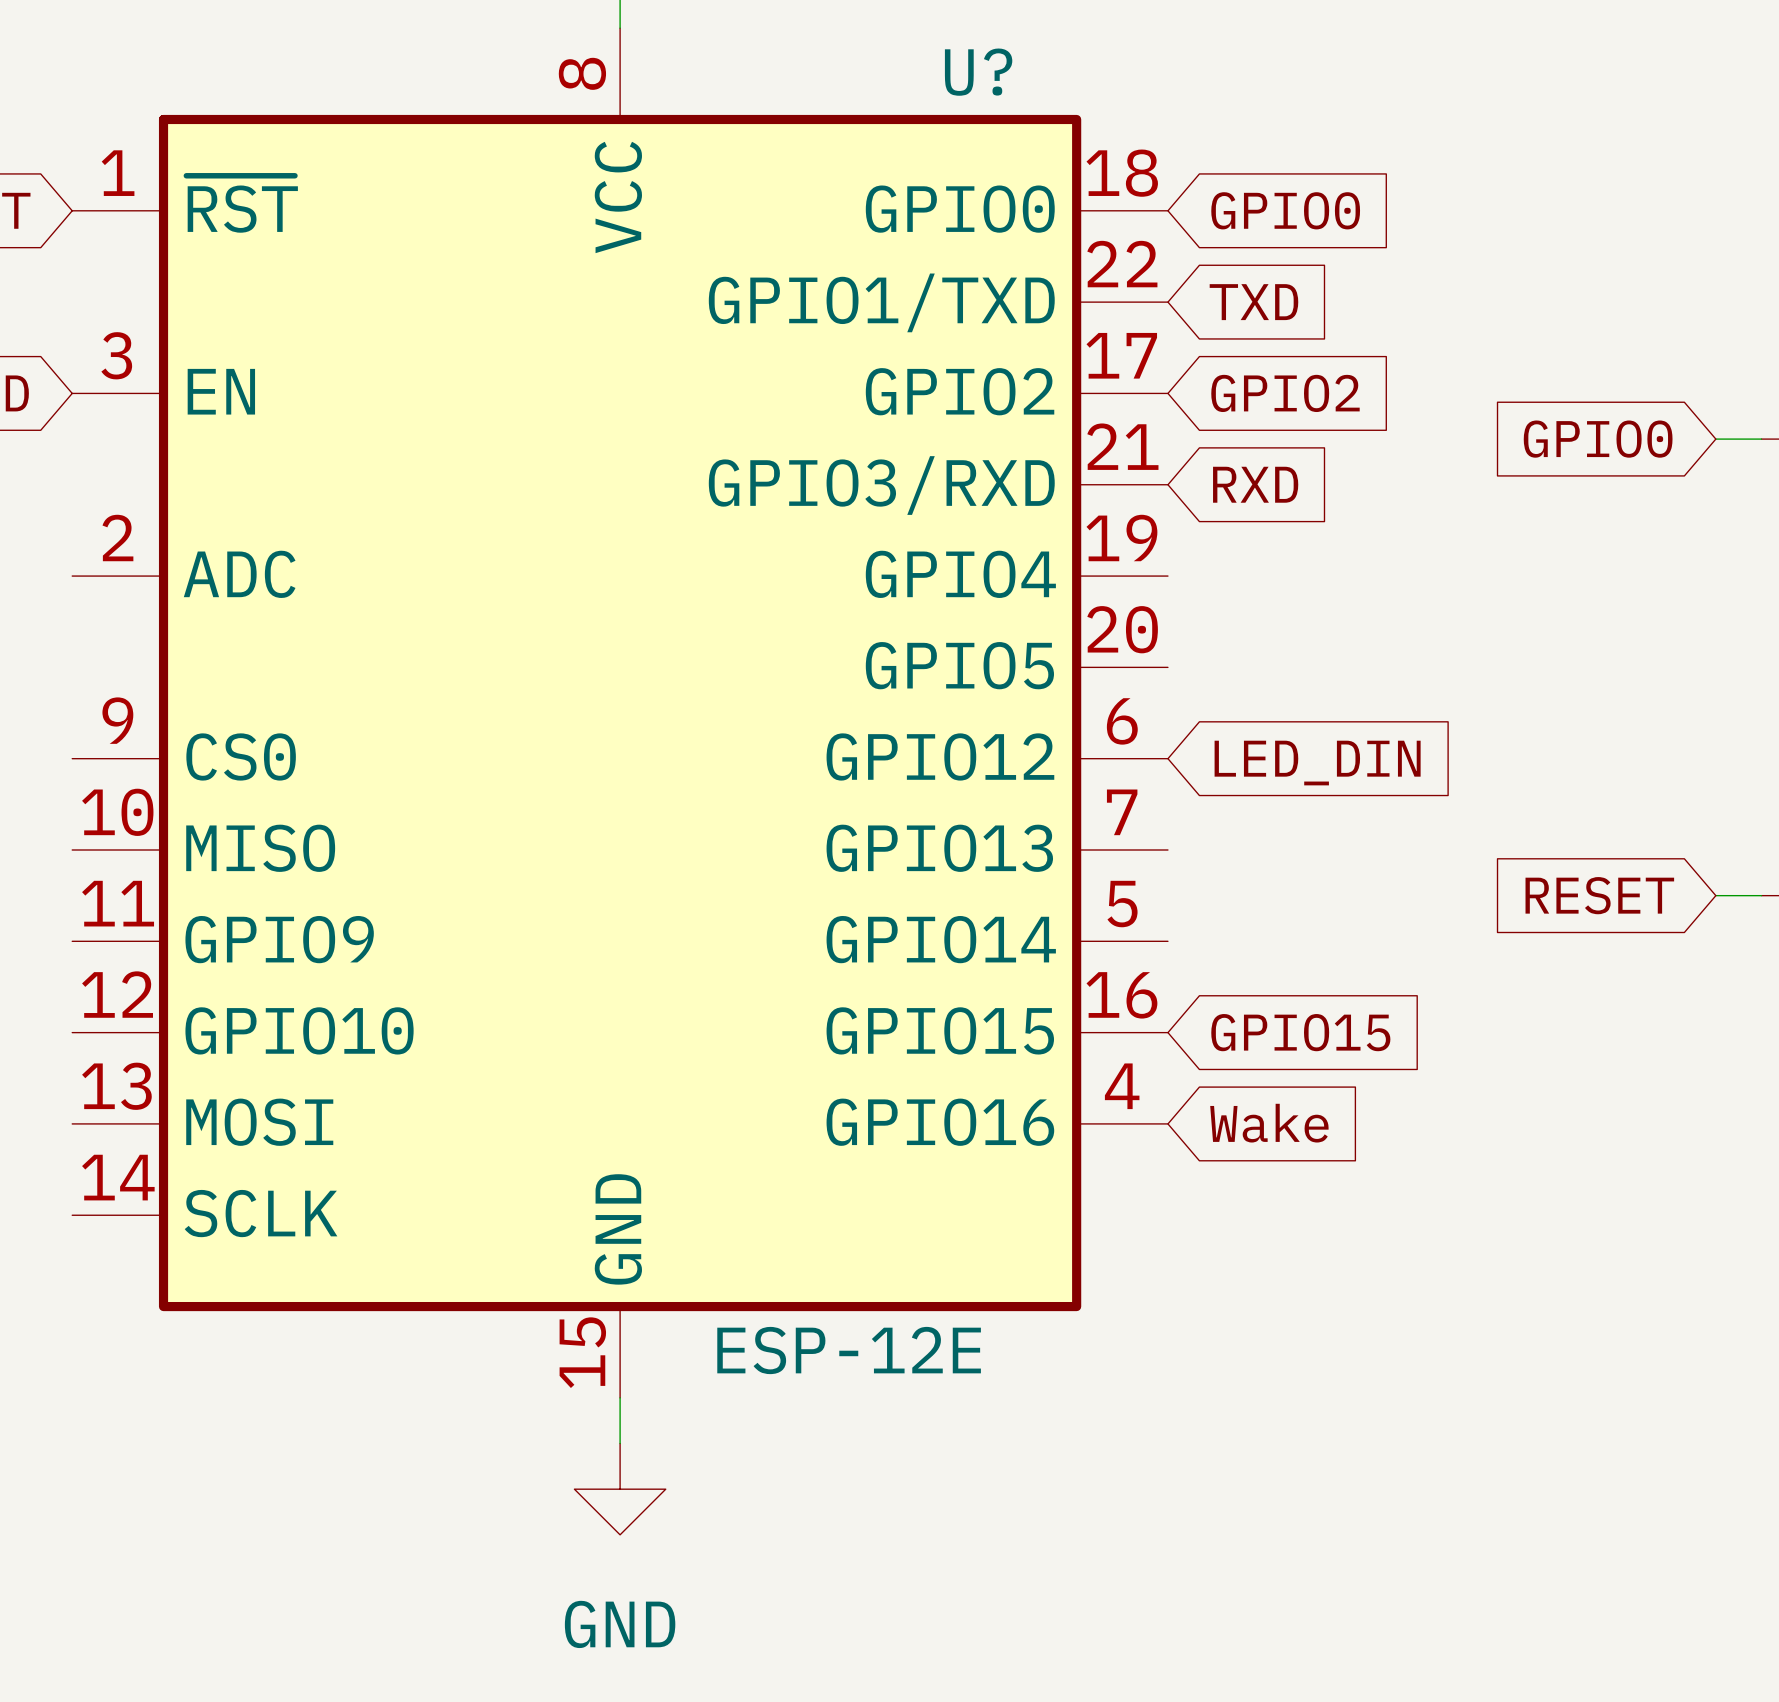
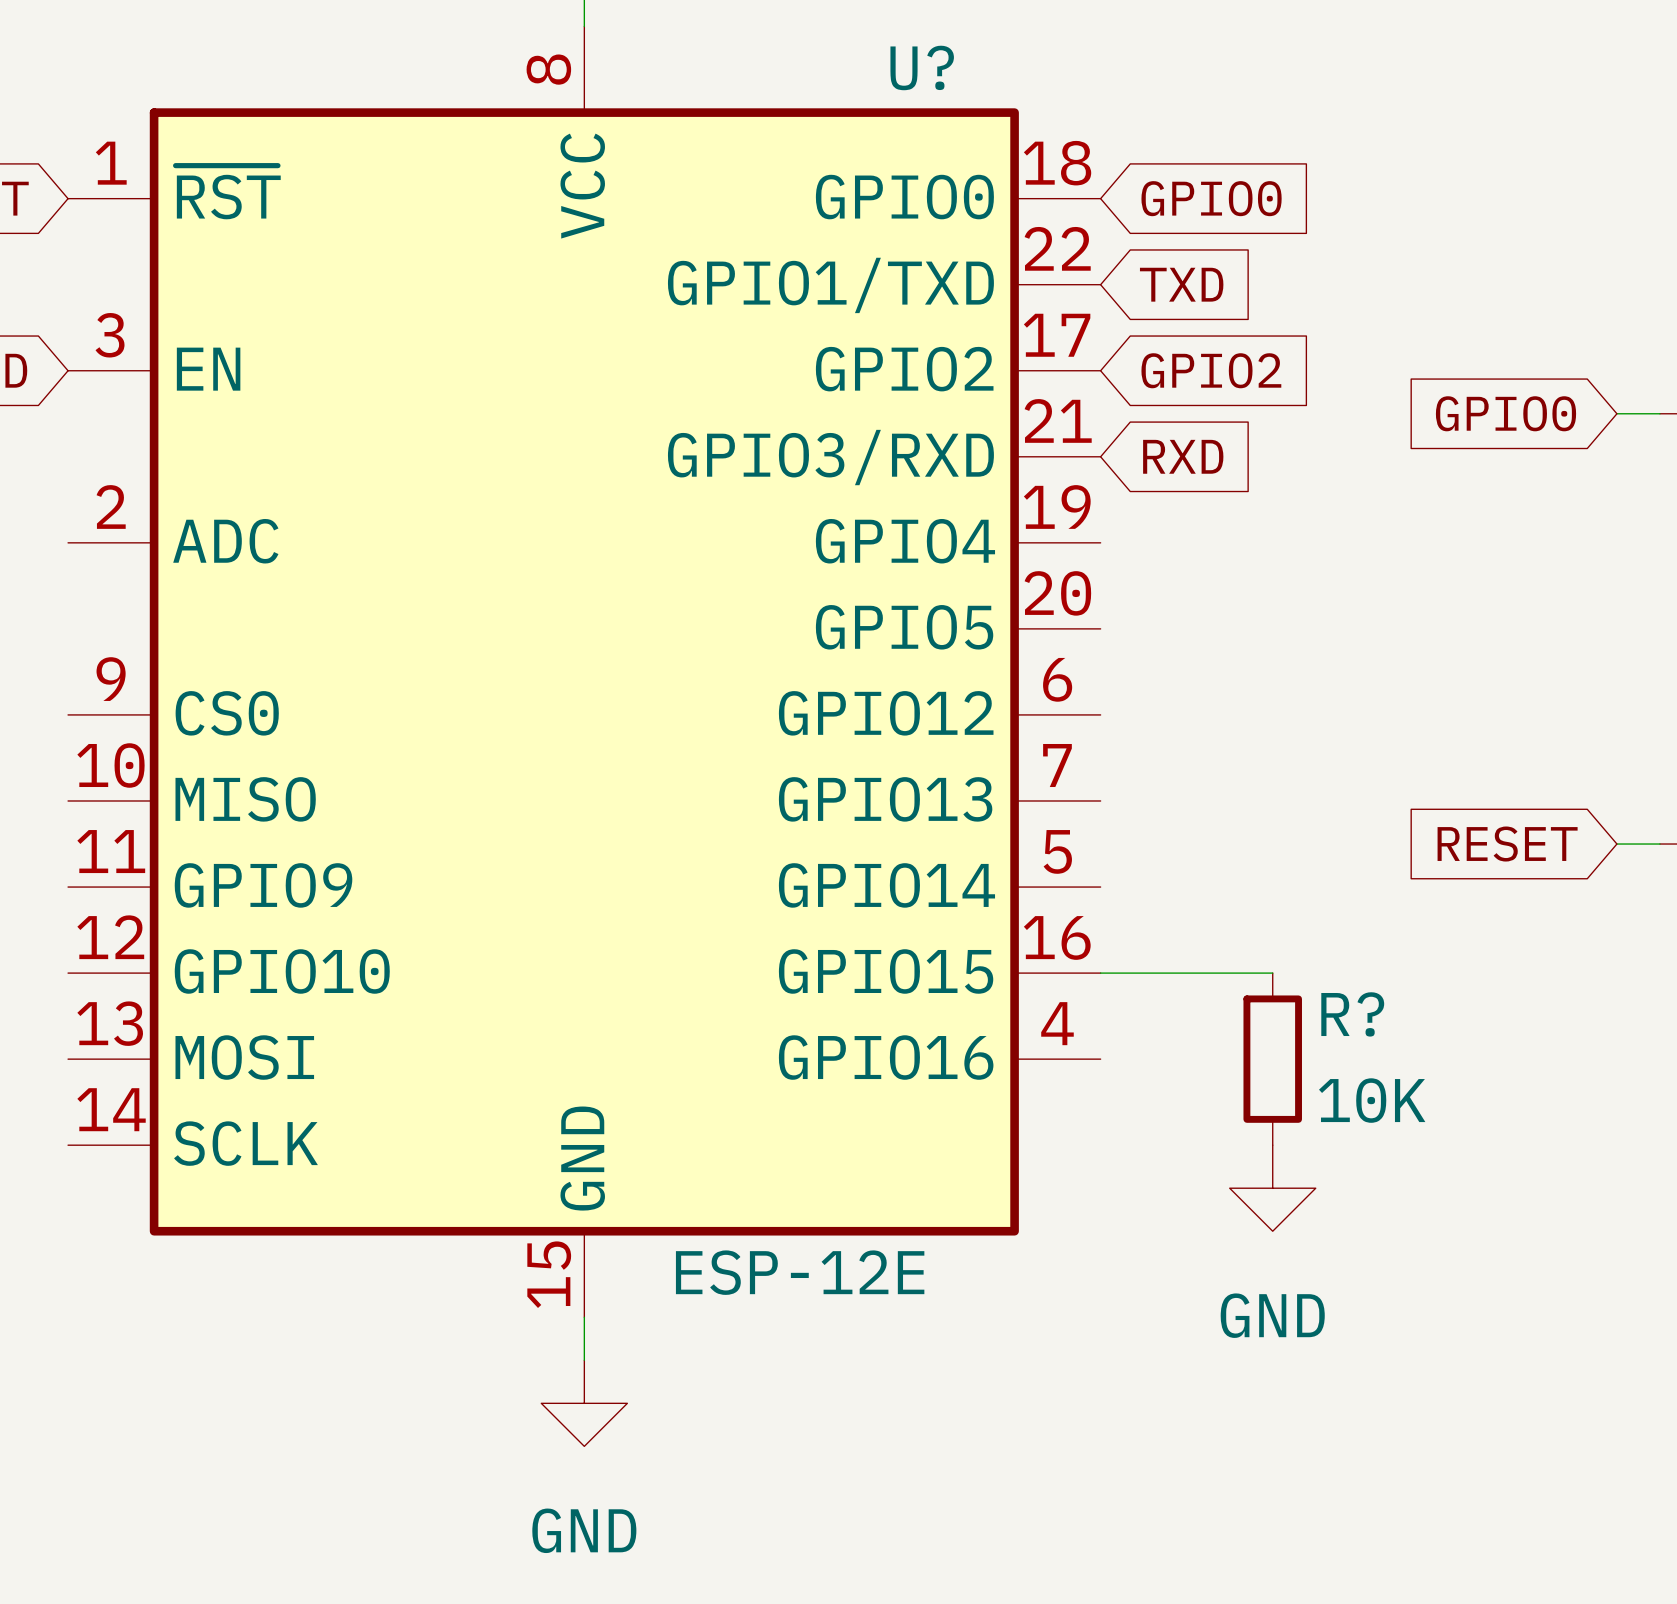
global label: LED_DIN (1317, 763) -> none
wire: none -> (1100, 973) (1272, 973)
global label: GPIO15 (1300, 1032) -> none
global label: Wake (1269, 1123) -> none
R?: none -> 10K (1272, 1059)
power symbol: none -> GND (1272, 1188)

